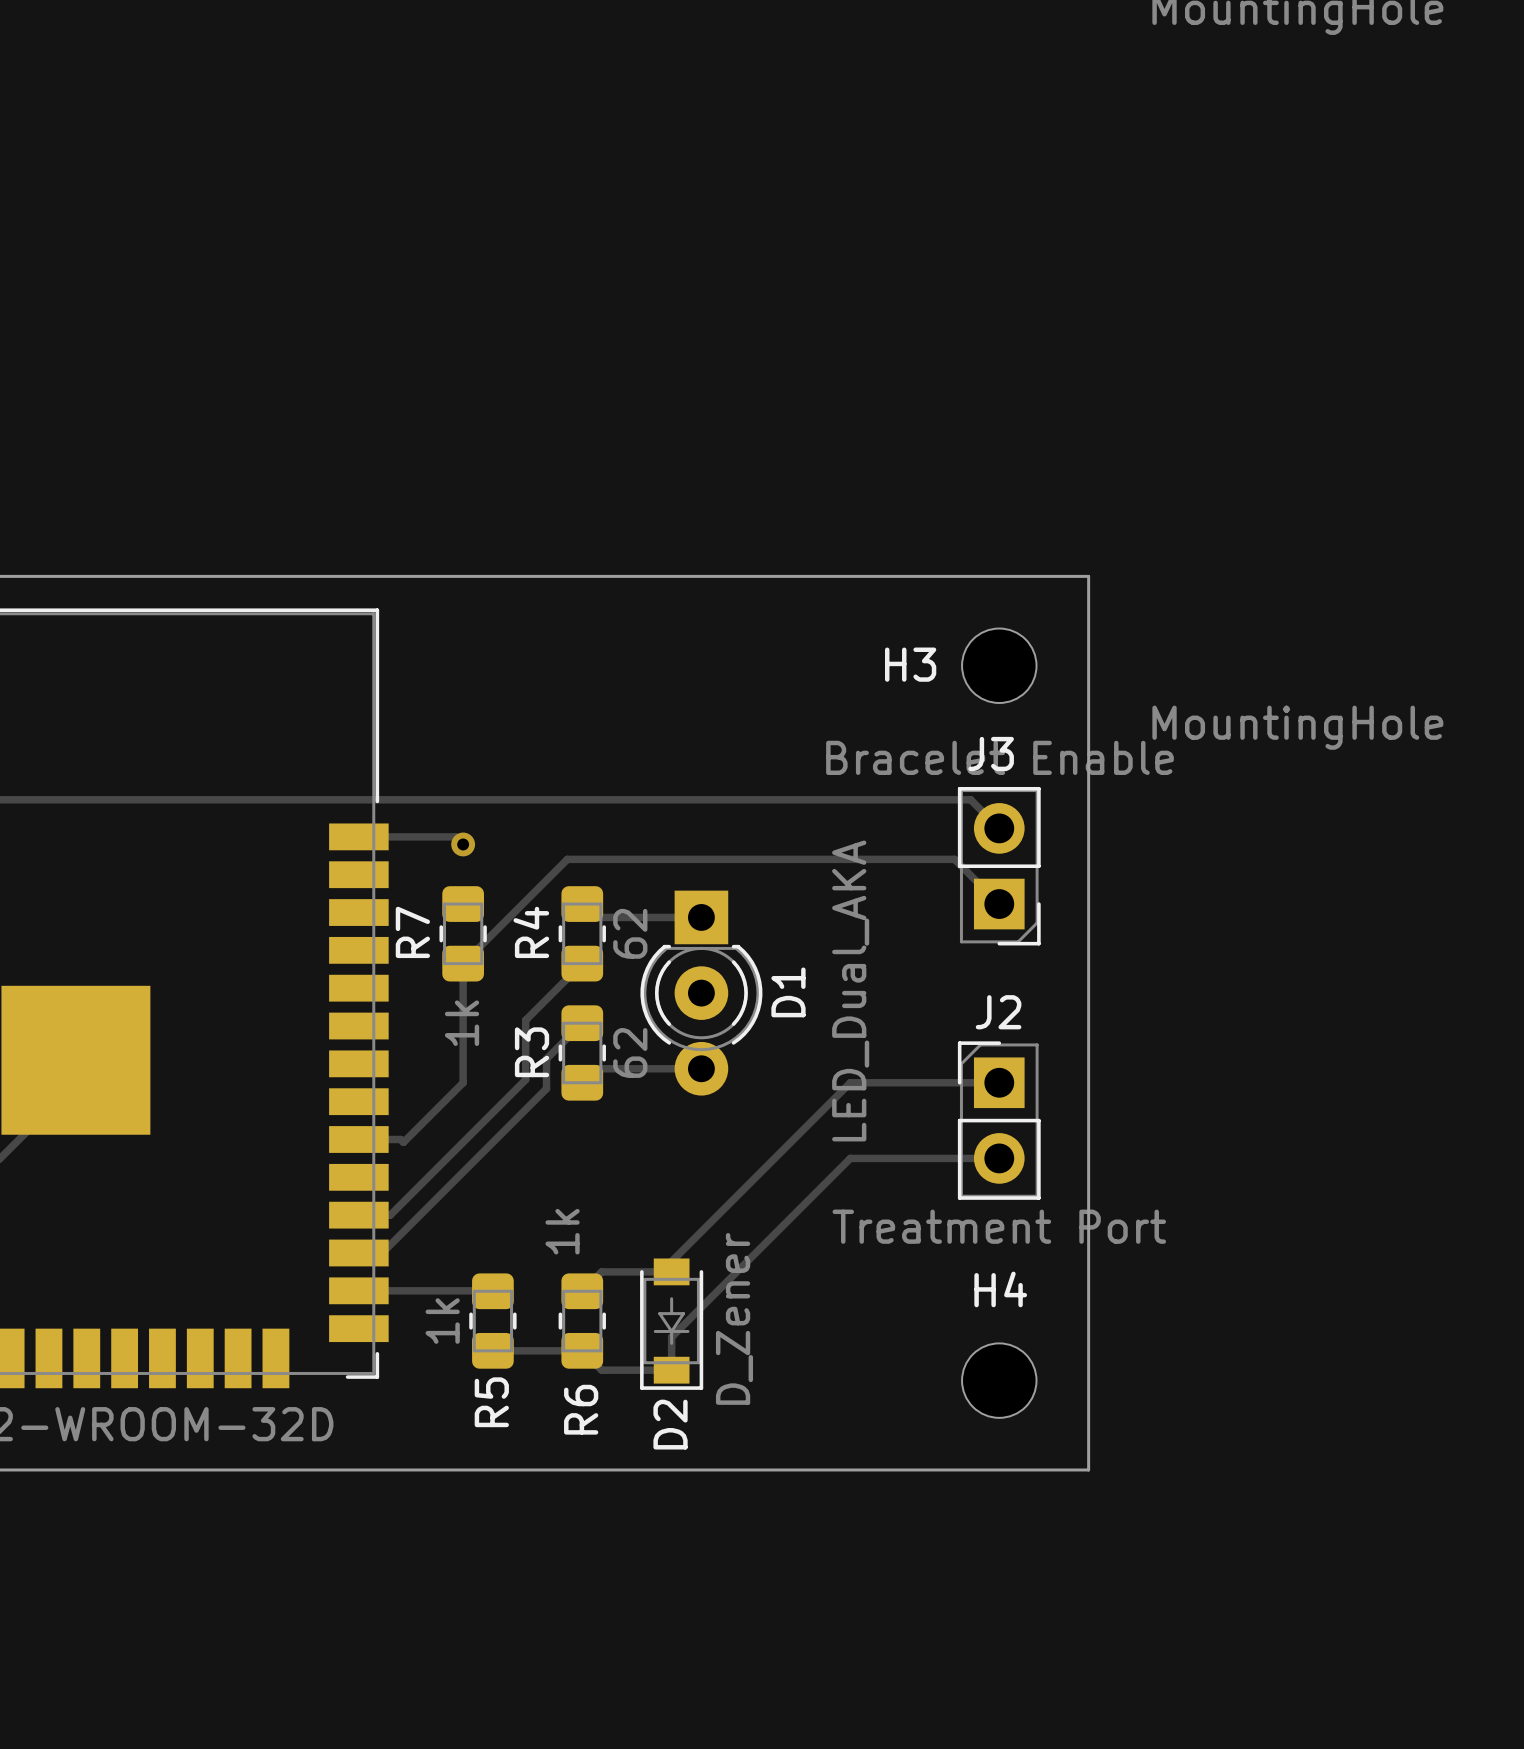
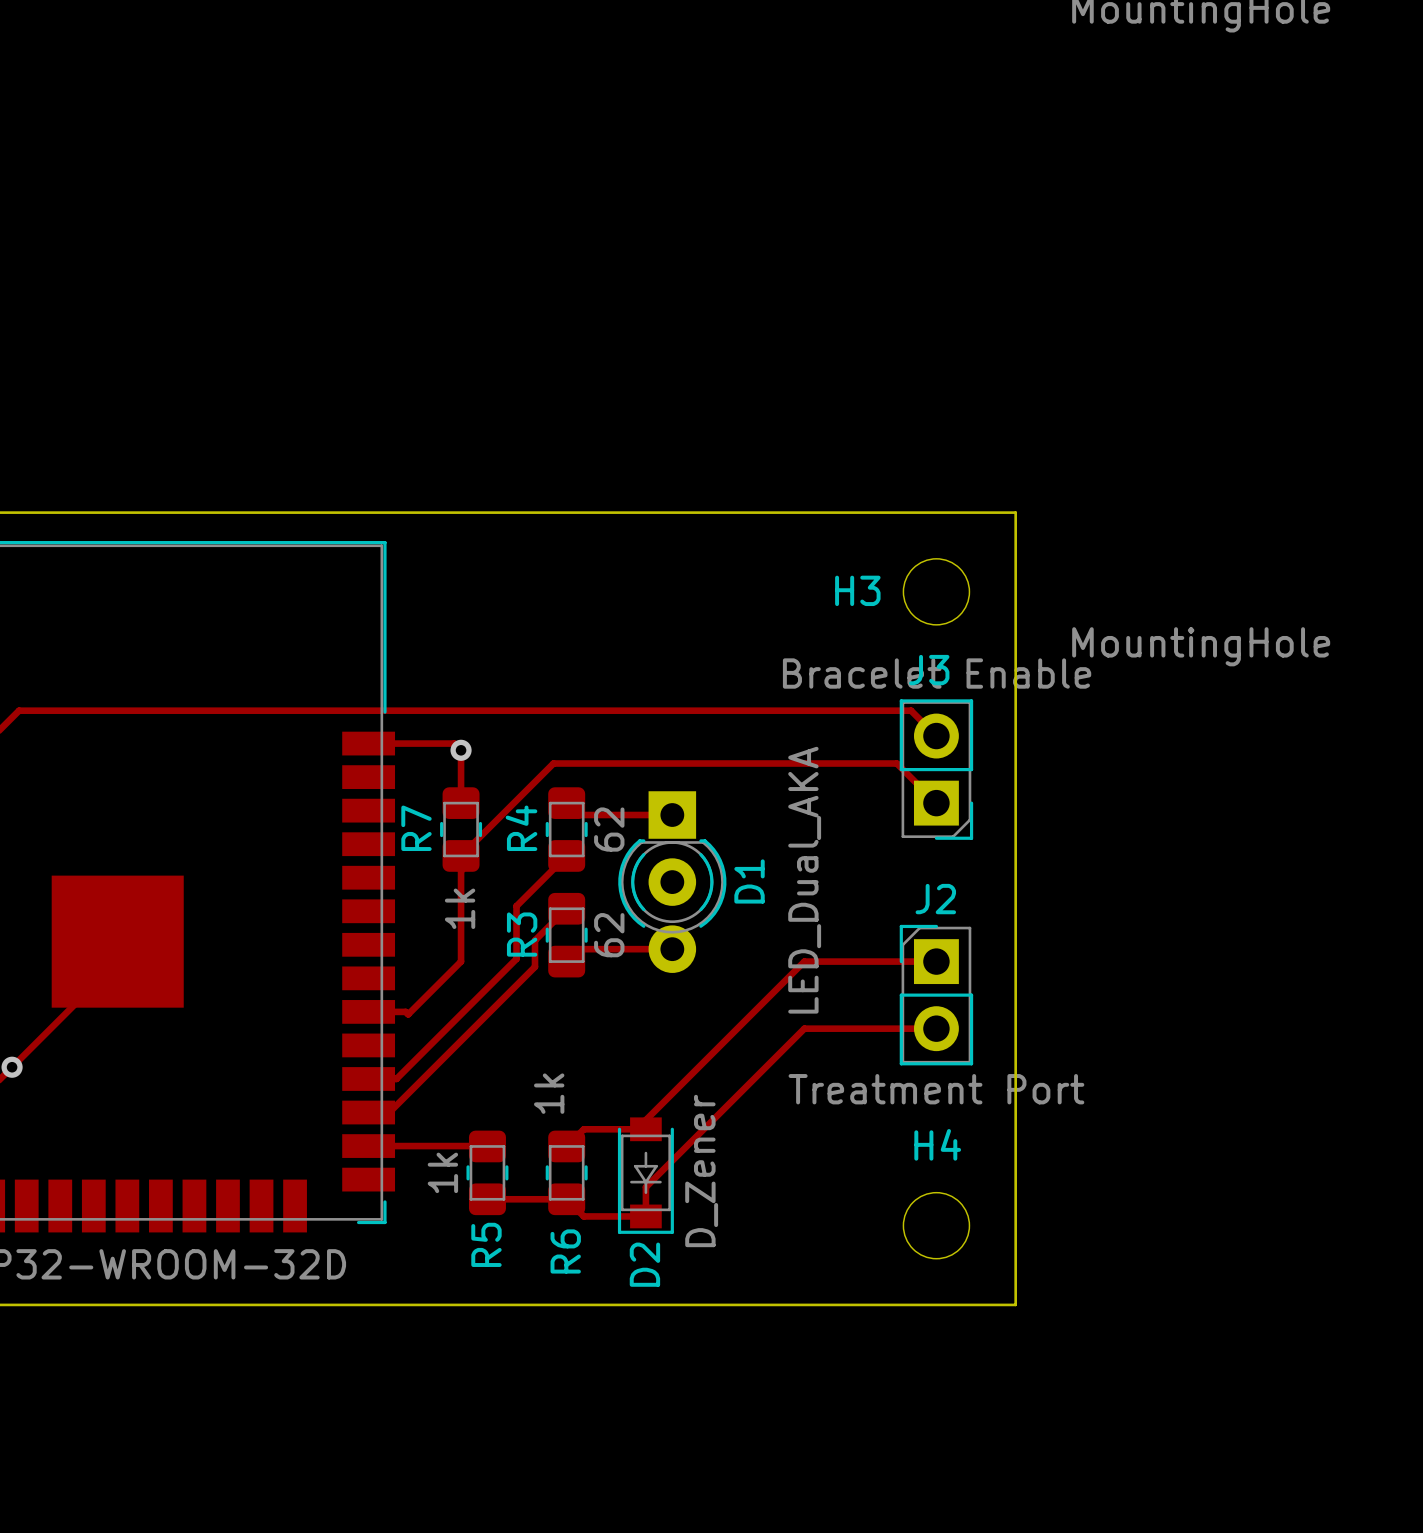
track: none -> (461, 750) (461, 803)

